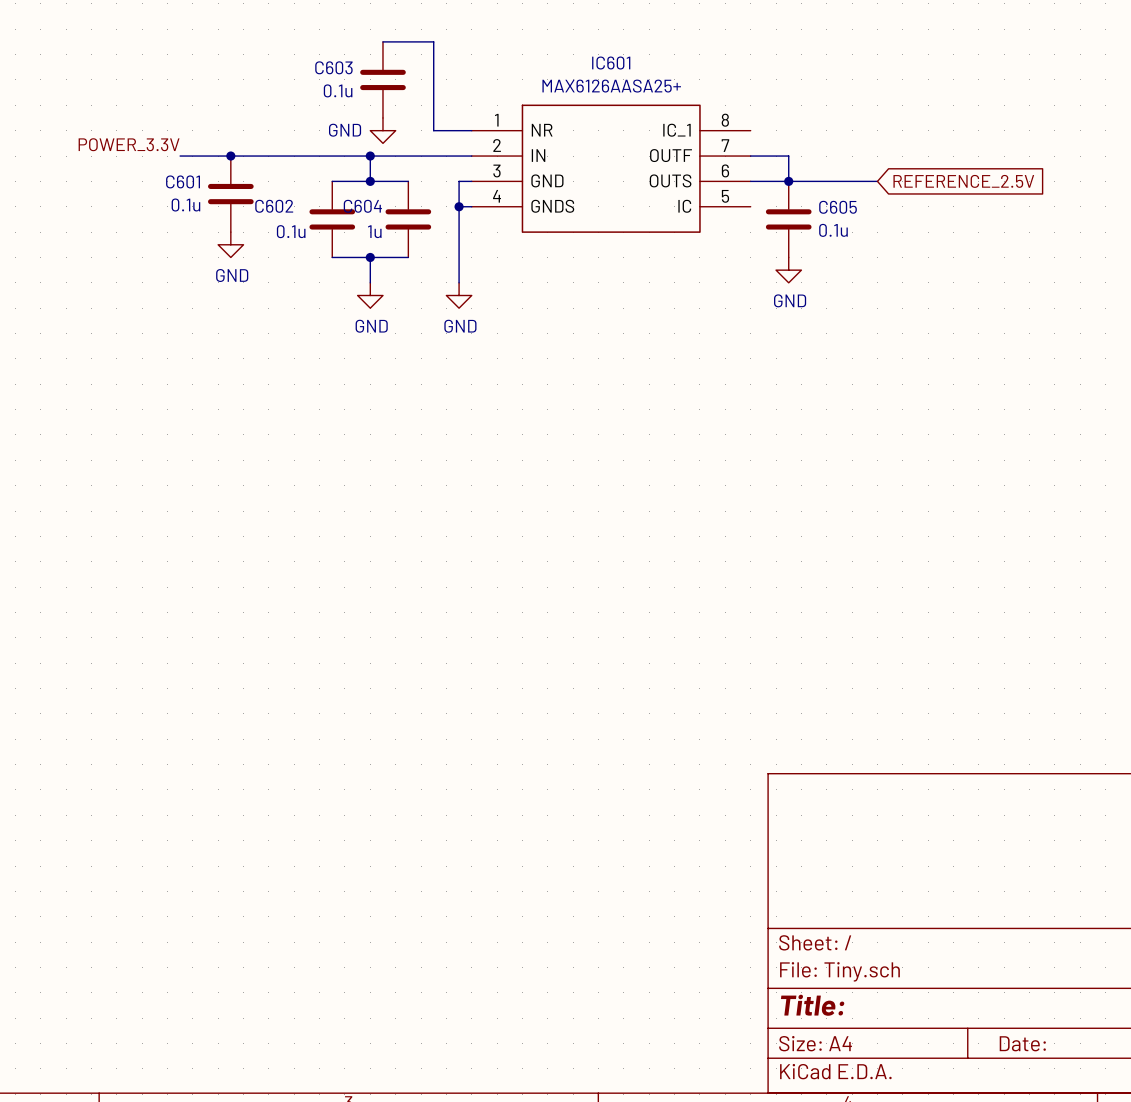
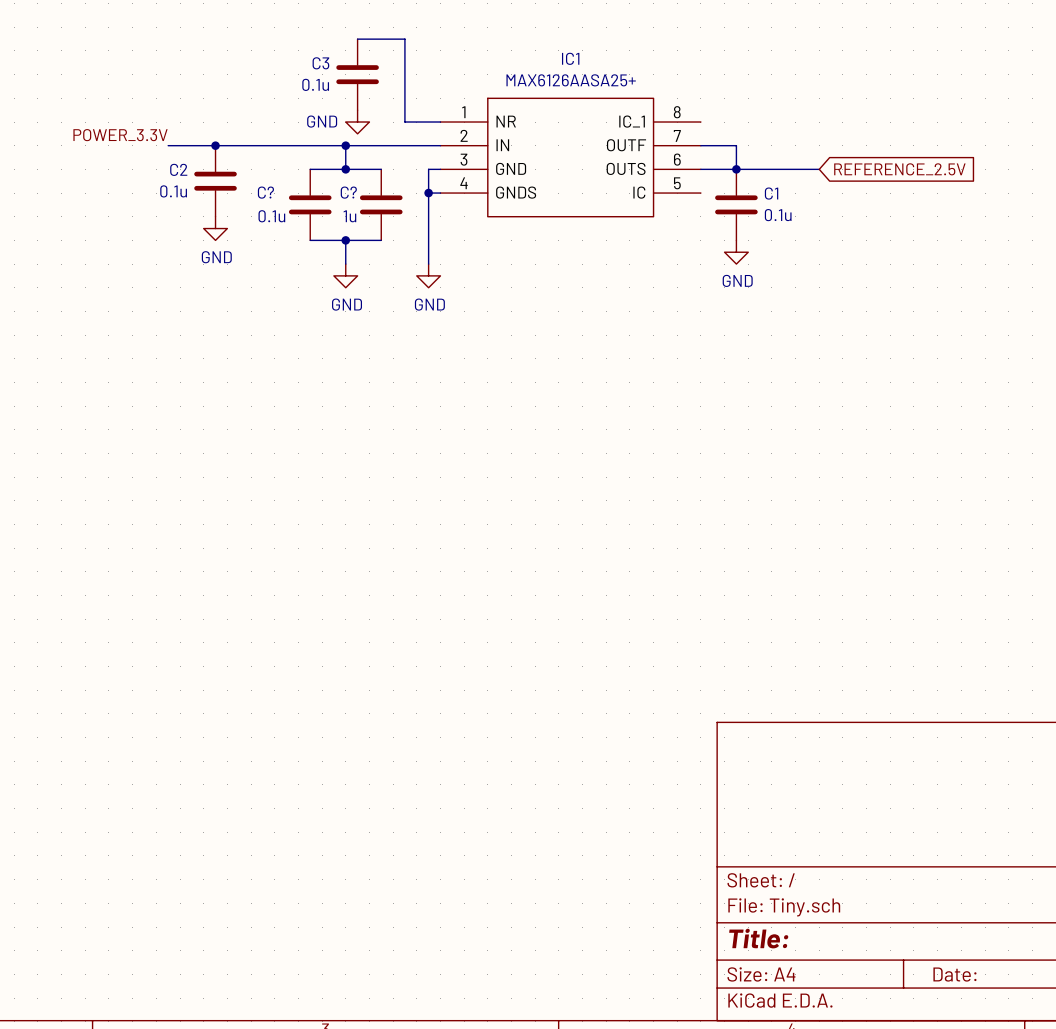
IC601 name: IC601 (611, 63) -> IC1 (570, 58)
C603 name: C603 (333, 67) -> C3 (320, 63)
C601 name: C601 (183, 181) -> C2 (178, 169)
C602 name: C602 (274, 206) -> C? (265, 192)
C604 name: C604 (362, 206) -> C? (348, 192)
C605 name: C605 (838, 207) -> C1 (771, 193)

